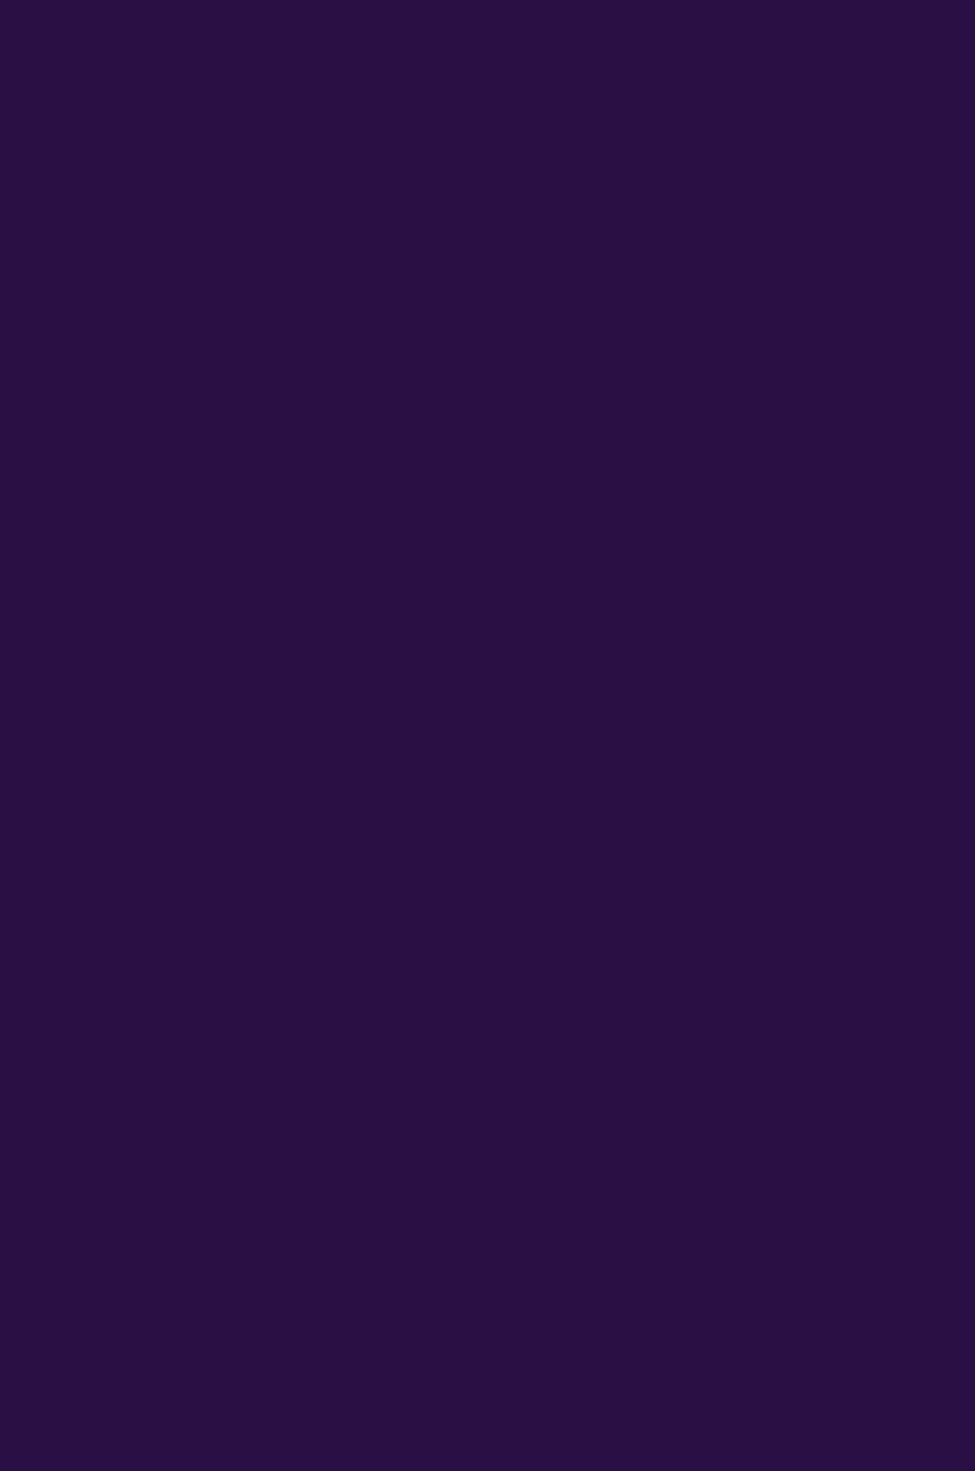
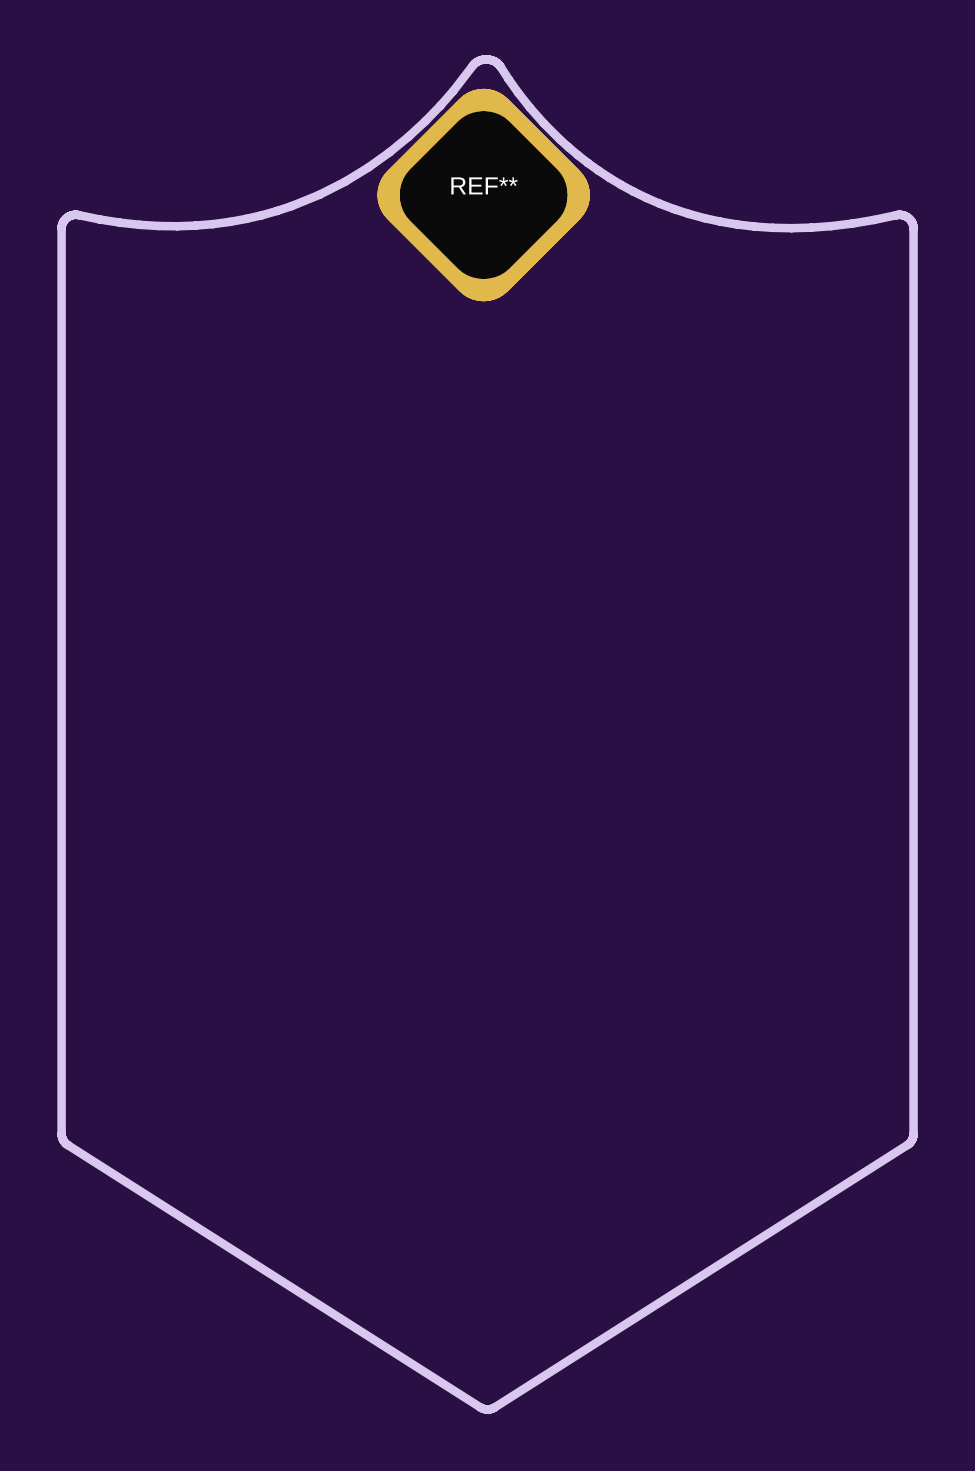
board edge: none -> (485, 59) (474, 63) (440, 105) (389, 152) (344, 181) (291, 206) (246, 218) (195, 225) (139, 224) (75, 214) (67, 217) (62, 223) (61, 1133) (63, 1140) (67, 1145) (480, 1407) (487, 1409) (494, 1407) (907, 1145) (912, 1137) (913, 228) (909, 218) (899, 214) (831, 226) (791, 228) (754, 226) (704, 218) (659, 203) (621, 184) (577, 155) (559, 139) (530, 107) (498, 64) (485, 59)
REF**: none -> (483, 195)

